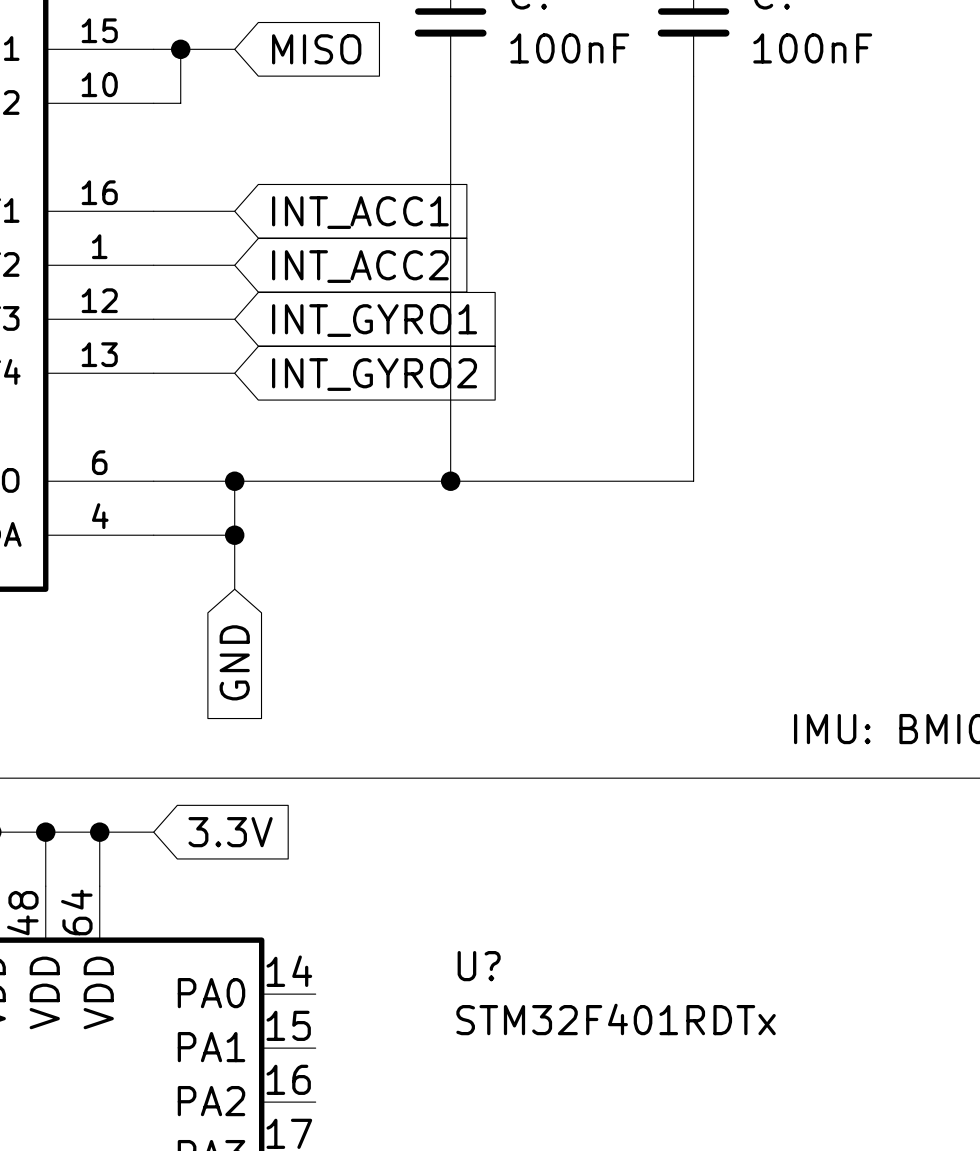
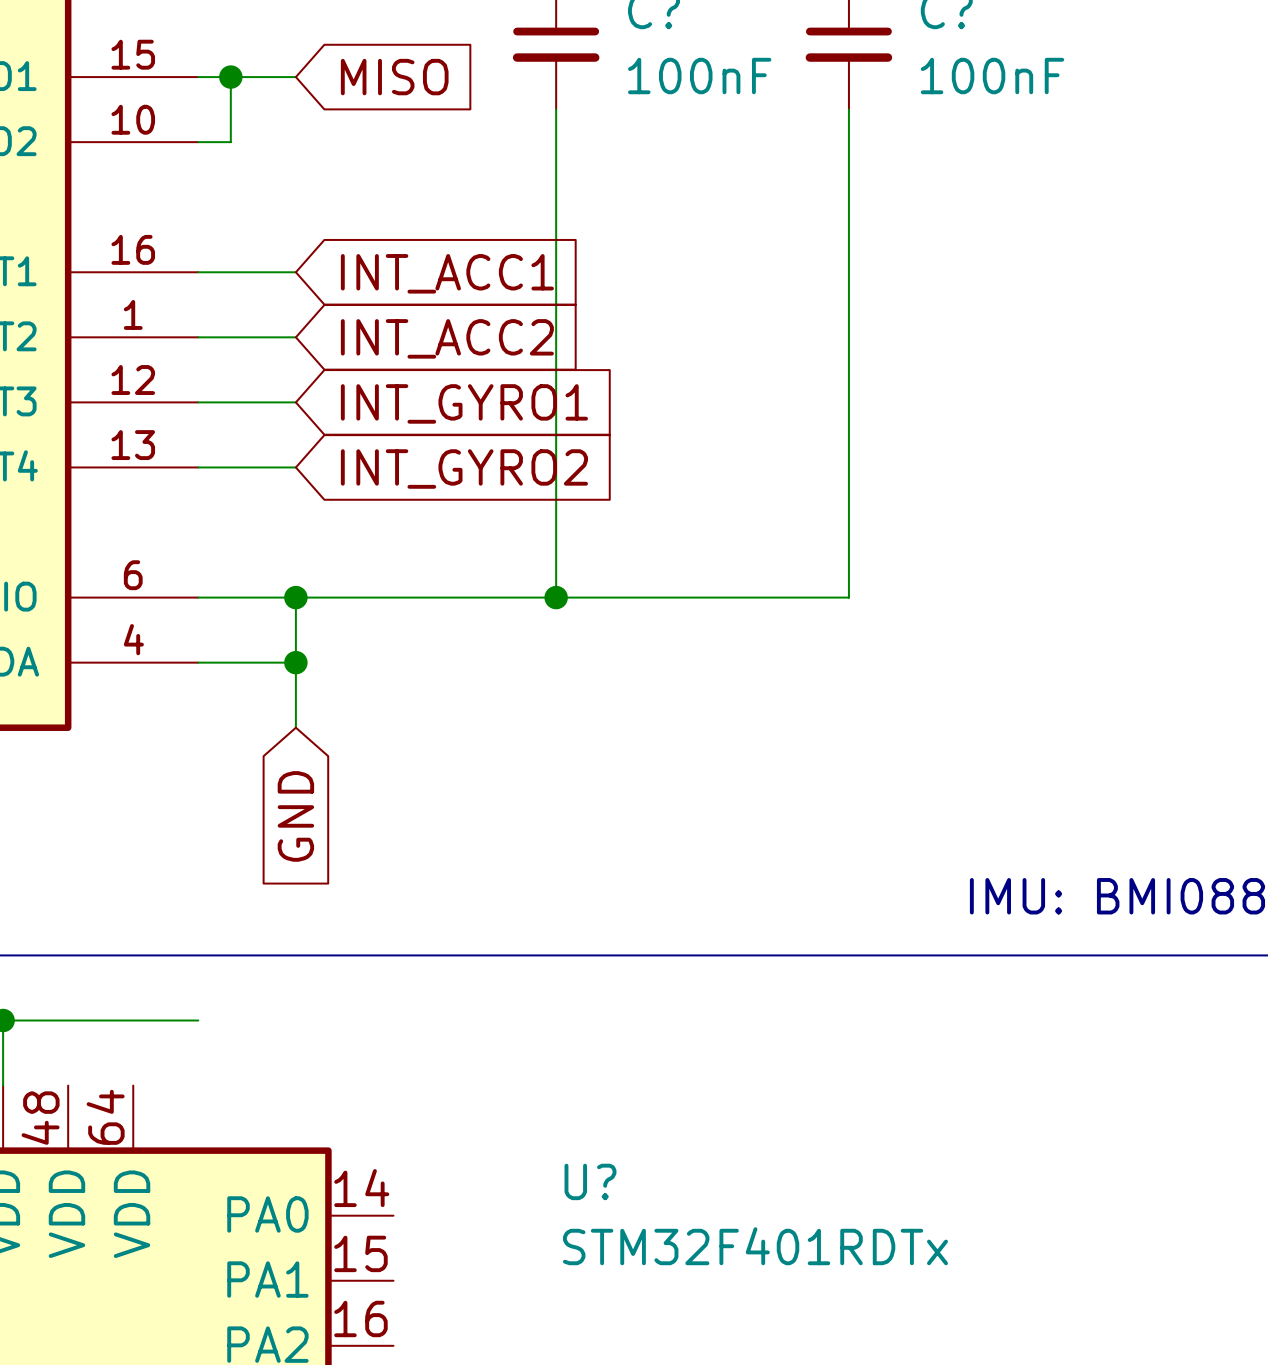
wire: (45, 832) (45, 886) -> none
junction: (45, 832) -> none
wire: (99, 832) (99, 886) -> none
junction: (99, 832) -> none
global label: 3.3V (230, 832) -> none

